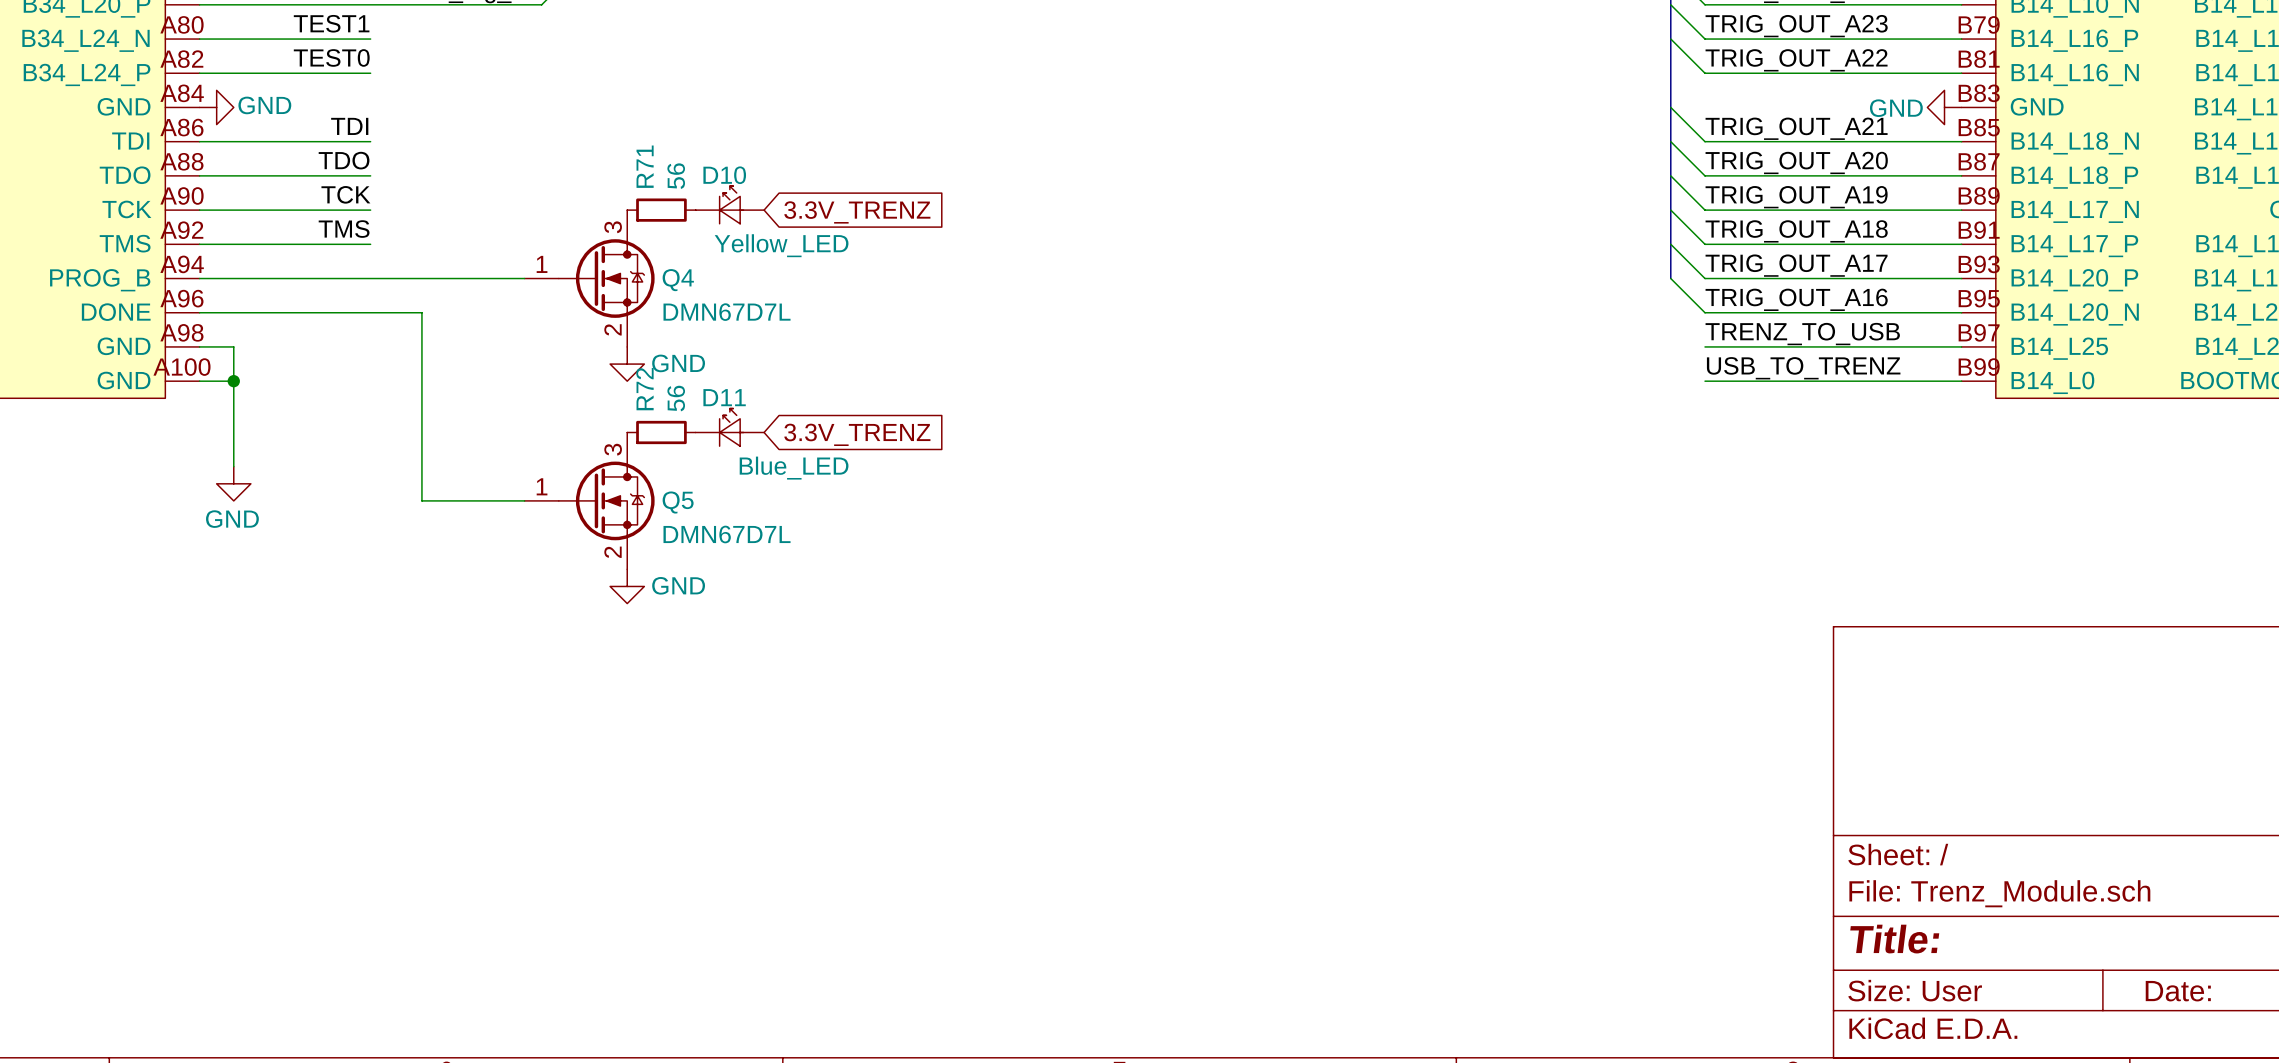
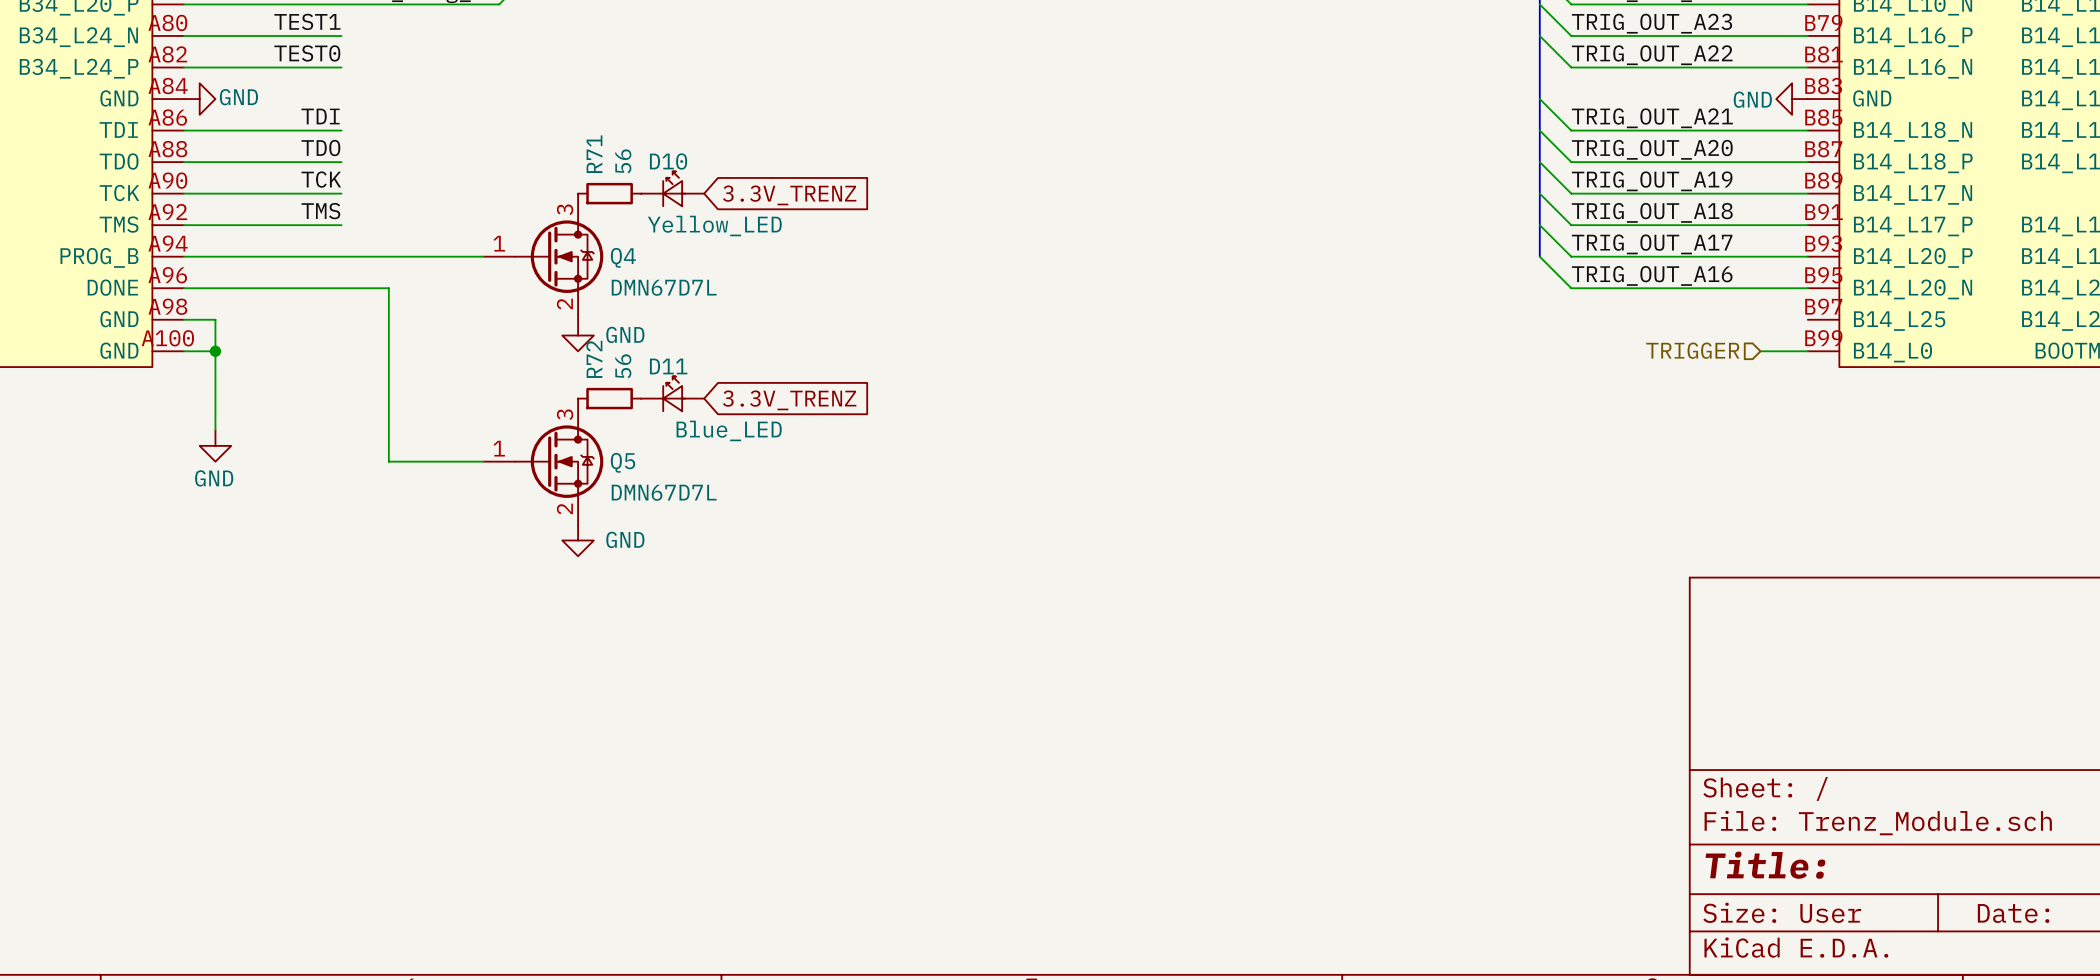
label: TRENZ_TO_USB (1802, 334) -> none
wire: (1705, 346) (1961, 346) -> none
label: USB_TO_TRENZ (1803, 368) -> none
hierarchical label: none -> TRIGGER (1692, 350)
wire: (1705, 381) (1910, 381) -> none

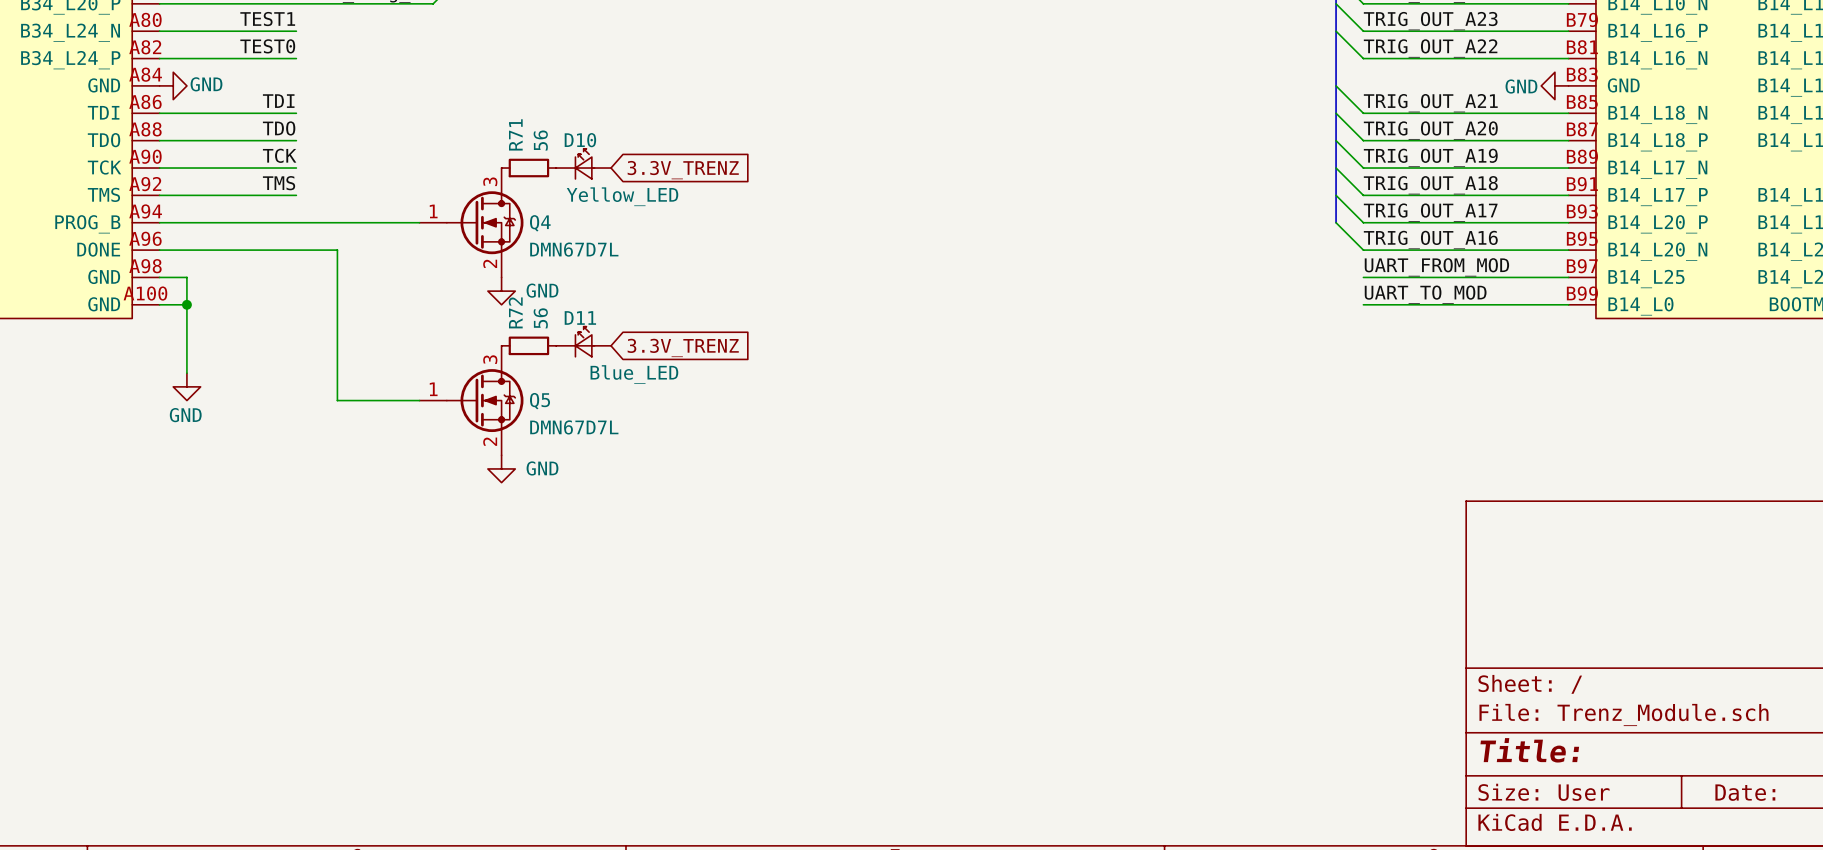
label: none -> UART_FROM_MOD (1436, 267)
wire: none -> (1363, 277) (1568, 277)
label: none -> UART_TO_MOD (1425, 294)
hierarchical label: TRIGGER (1692, 350) -> none
wire: none -> (1363, 304) (1527, 304)

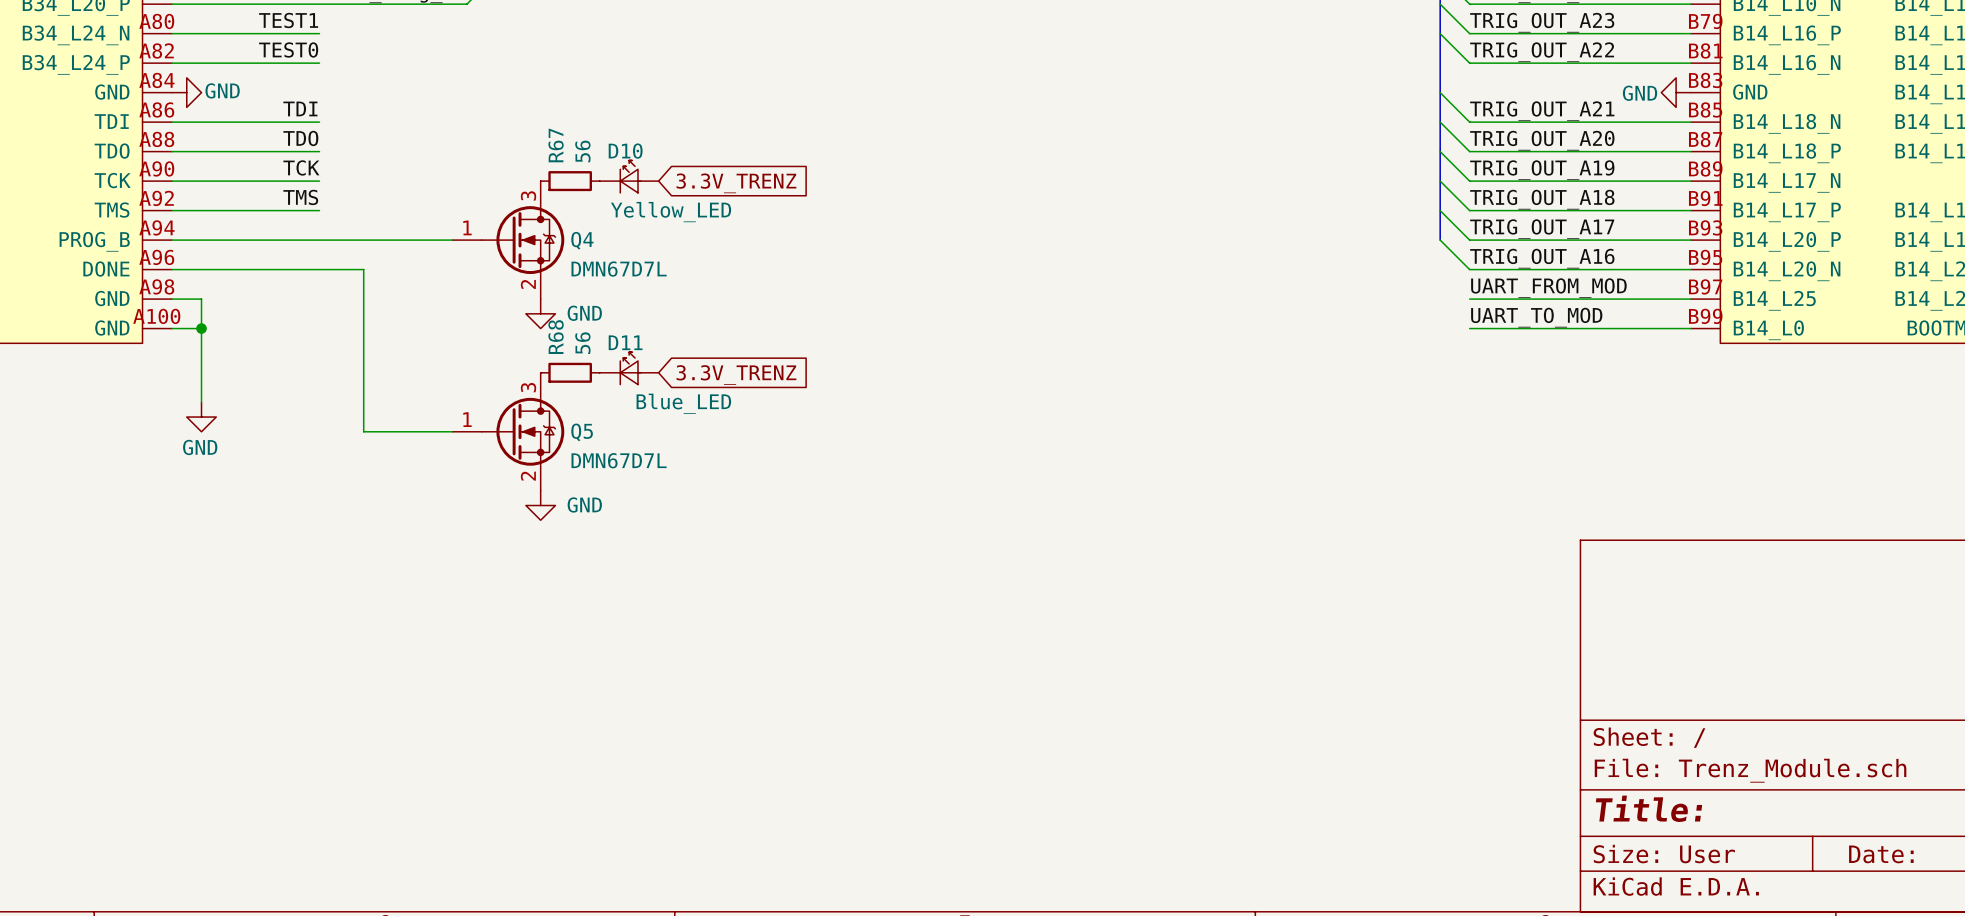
R71 name: R71 (515, 134) -> R67 (556, 145)
R72 name: R72 (515, 312) -> R68 (556, 337)

